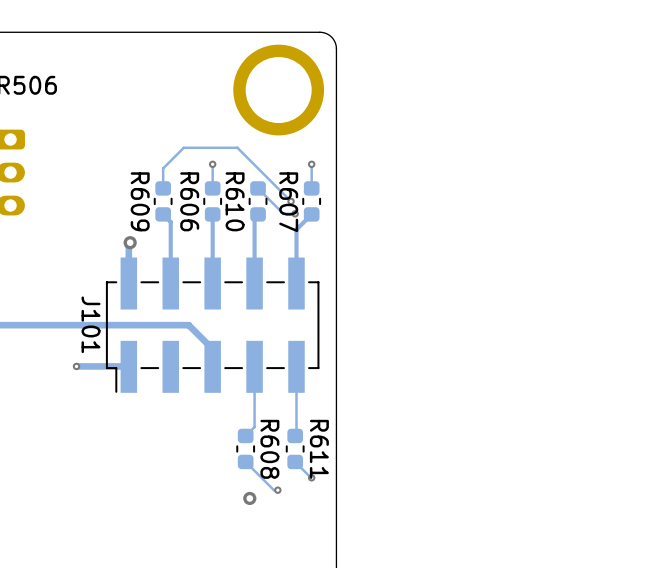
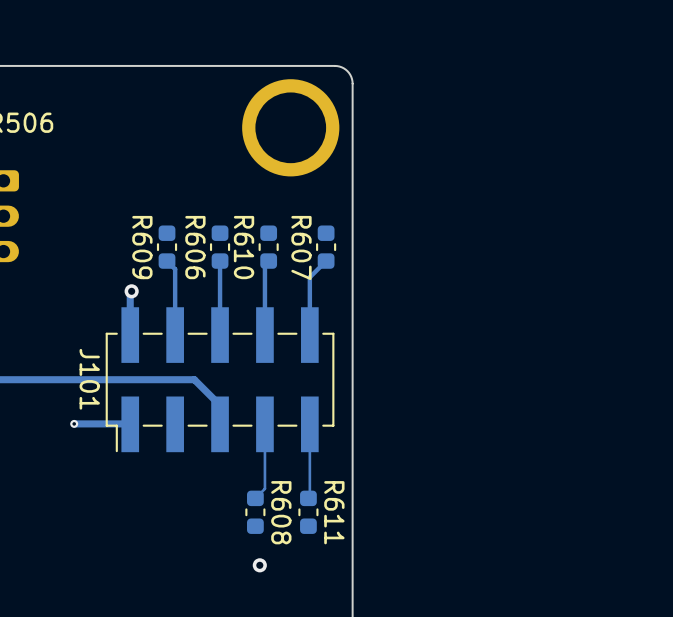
track: (212, 164) (212, 188) -> none
via: (212, 164) -> none
track: (311, 164) (311, 188) -> none
via: (311, 164) -> none
track: (163, 188) (163, 168) (183, 147) (237, 147) (291, 201) -> none
track: (258, 188) (283, 213) (295, 213) -> none
via: (291, 201) -> none
via: (295, 213) -> none
track: (245, 461) (273, 490) (277, 490) -> none
track: (295, 461) (311, 477) -> none
via: (311, 477) -> none
via: (277, 490) -> none

